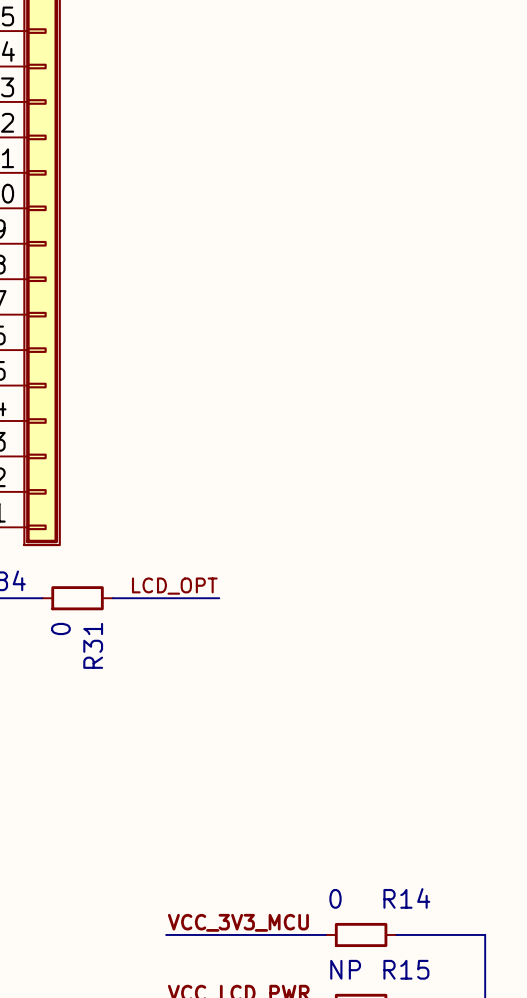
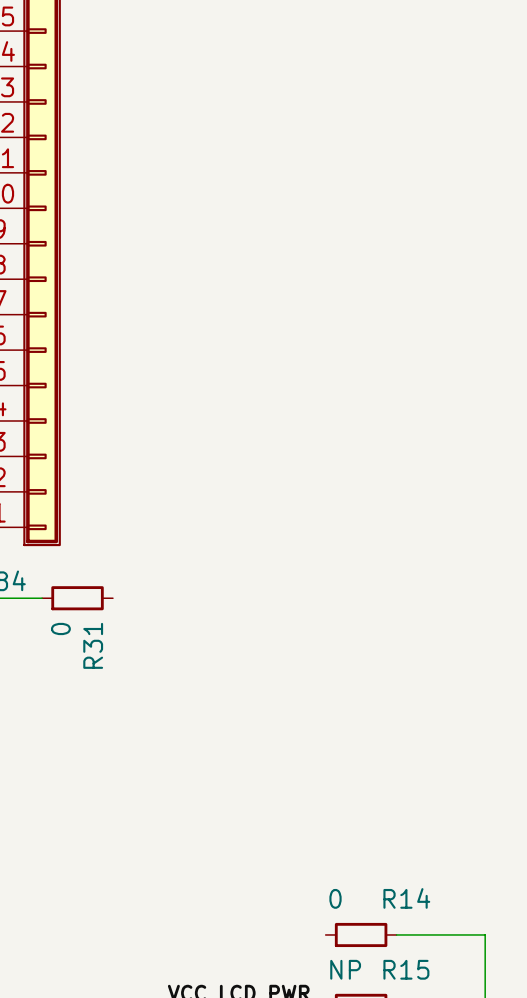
label: LCD_OPT (174, 586) -> none
wire: (112, 598) (219, 598) -> none
label: VCC_3V3_MCU (238, 922) -> none
wire: (166, 934) (325, 934) -> none

